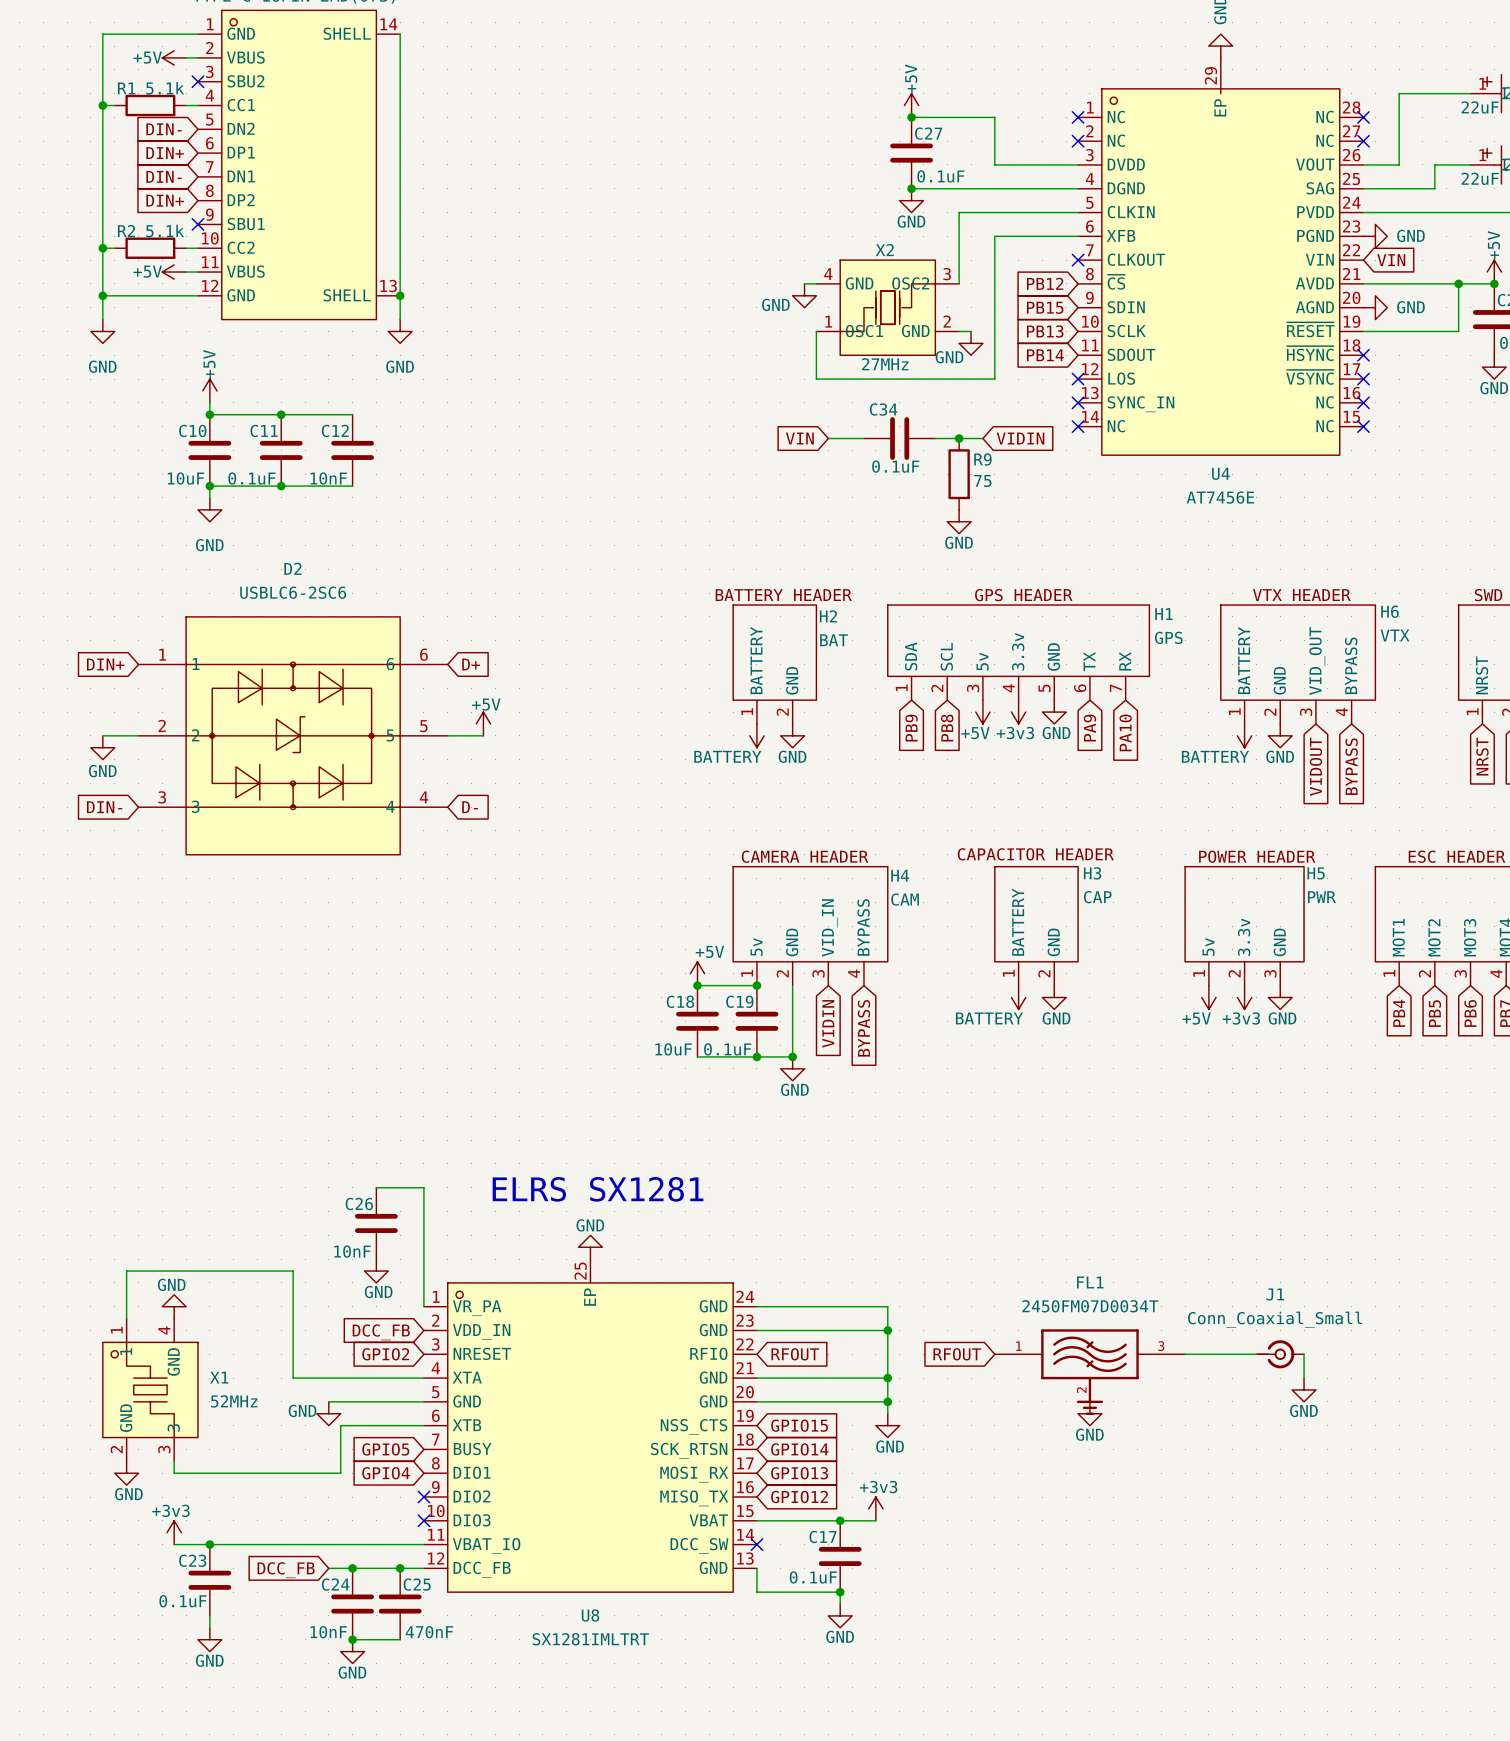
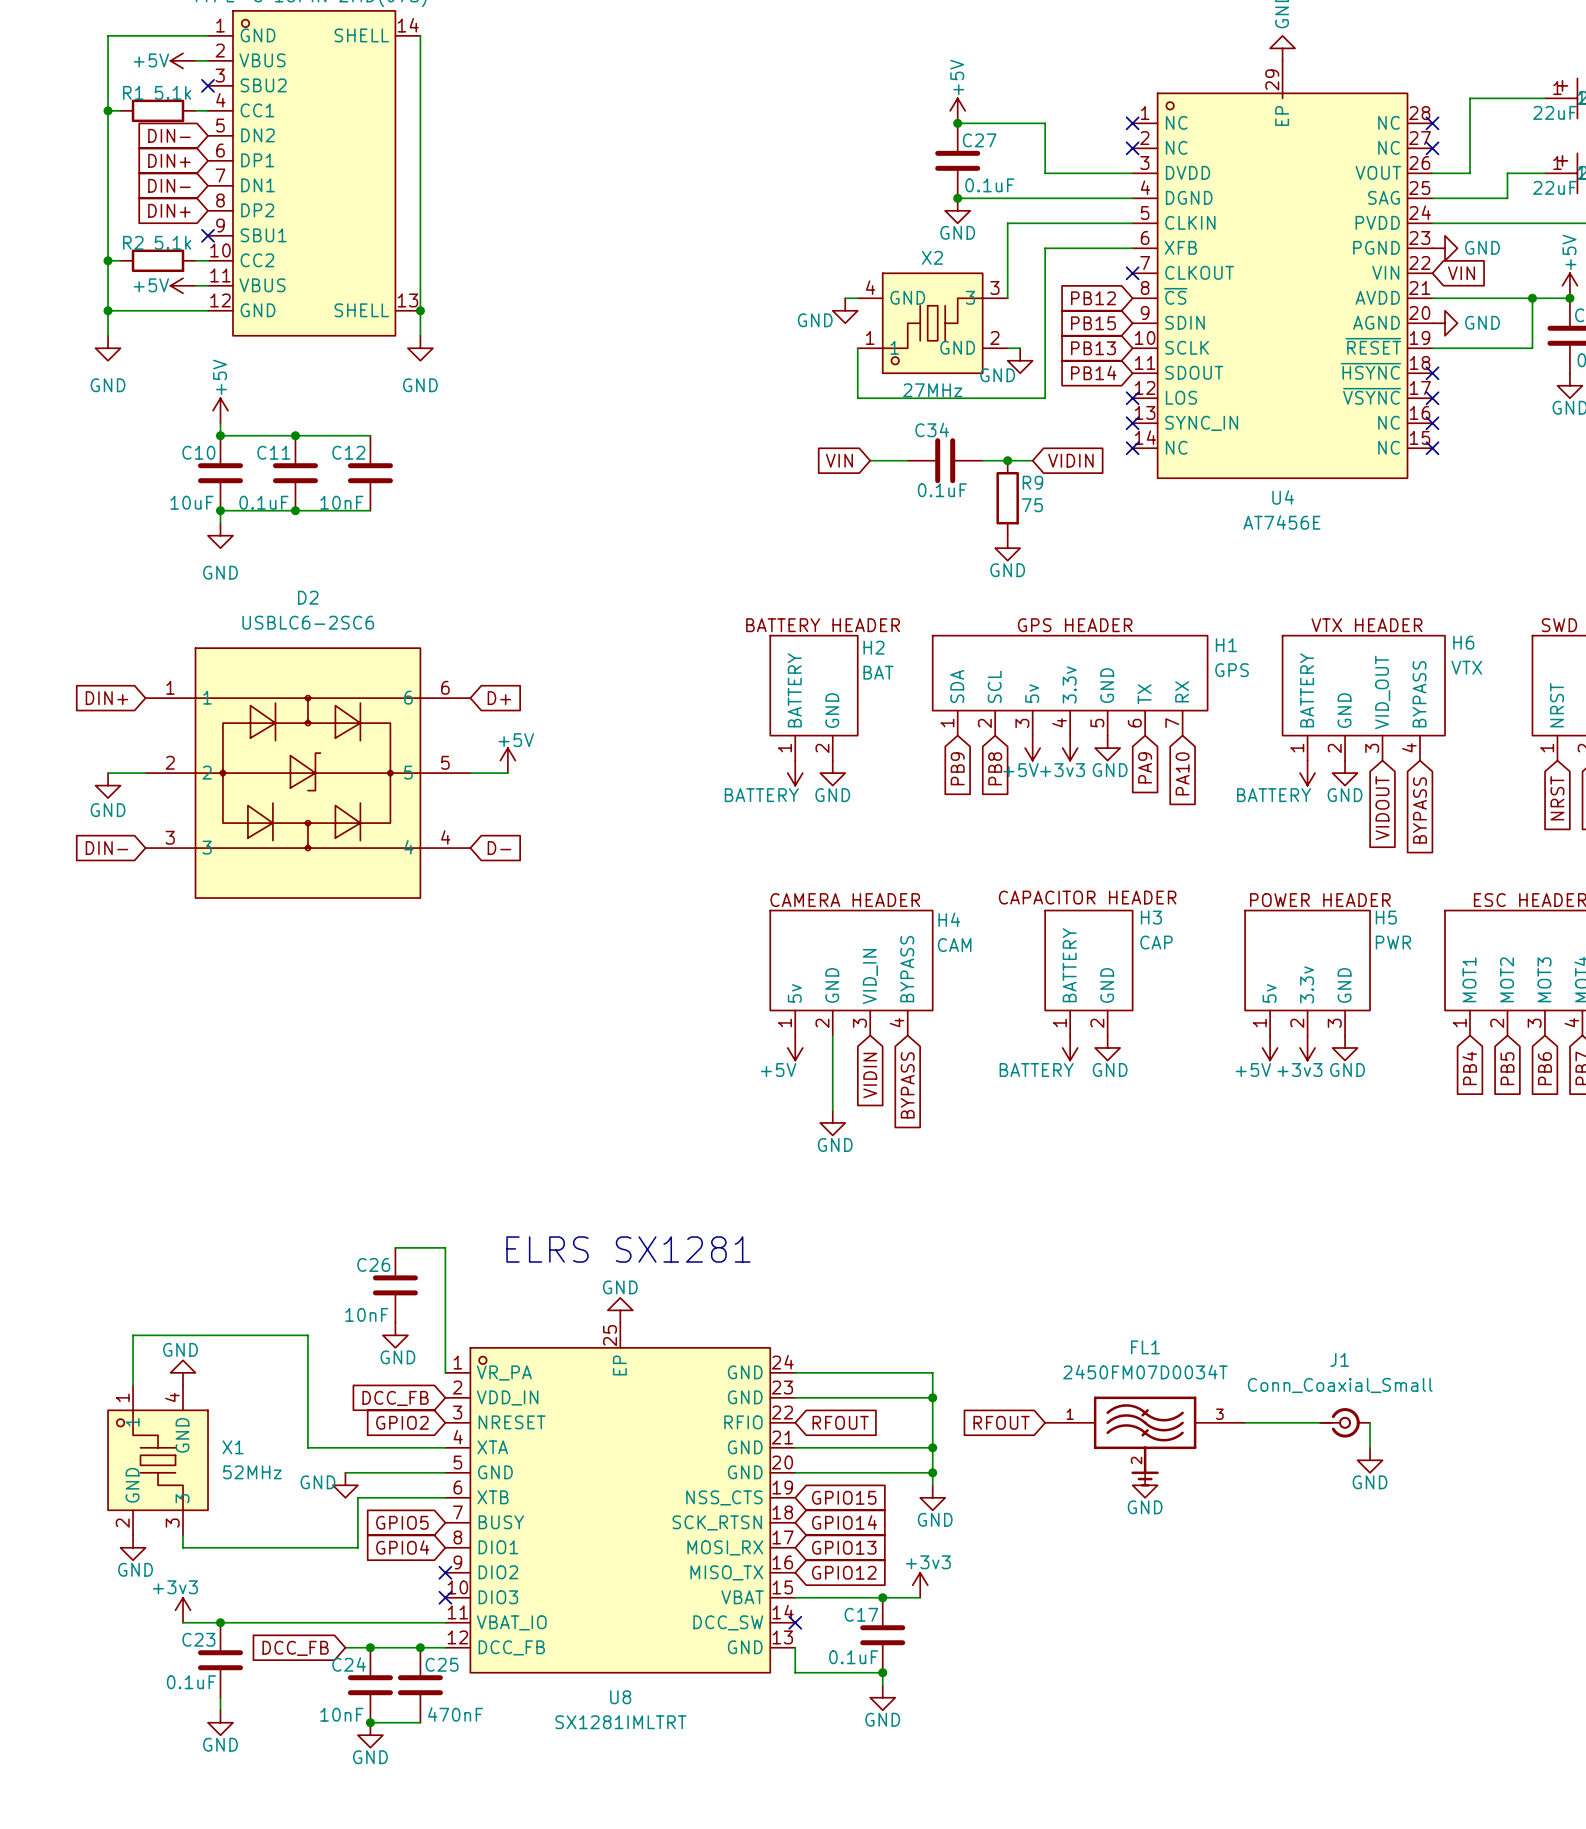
X2 symbol: [816, 260, 960, 356] -> [857, 273, 1008, 374]
power symbol rotation: 0° (697, 973) -> 180° (795, 1047)
power symbol position: +5V (697, 973) -> +5V (795, 1047)
wire: (697, 985) (756, 985) -> none
junction: (697, 985) -> none
junction: (756, 985) -> none
C18: 10uF (697, 1021) -> none
C19: 0.1uF (756, 1021) -> none
wire: (697, 1056) (792, 1056) -> none
junction: (756, 1056) -> none
junction: (792, 1056) -> none

